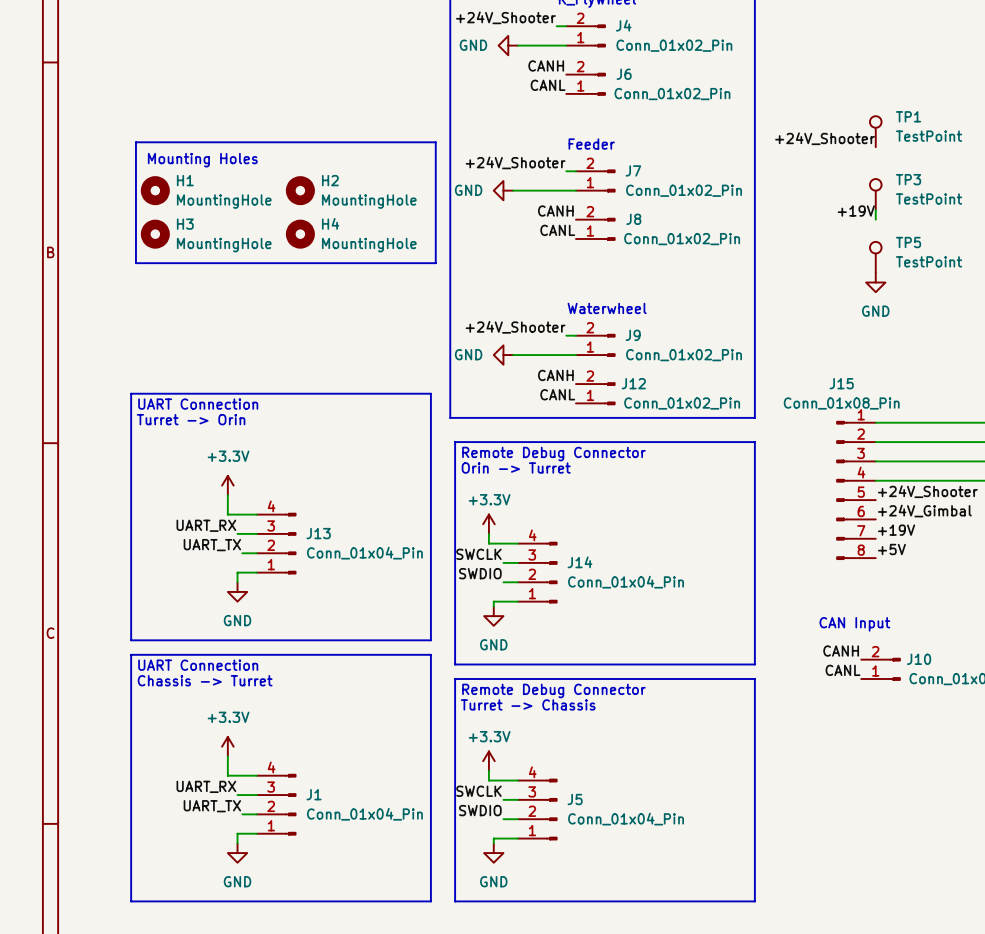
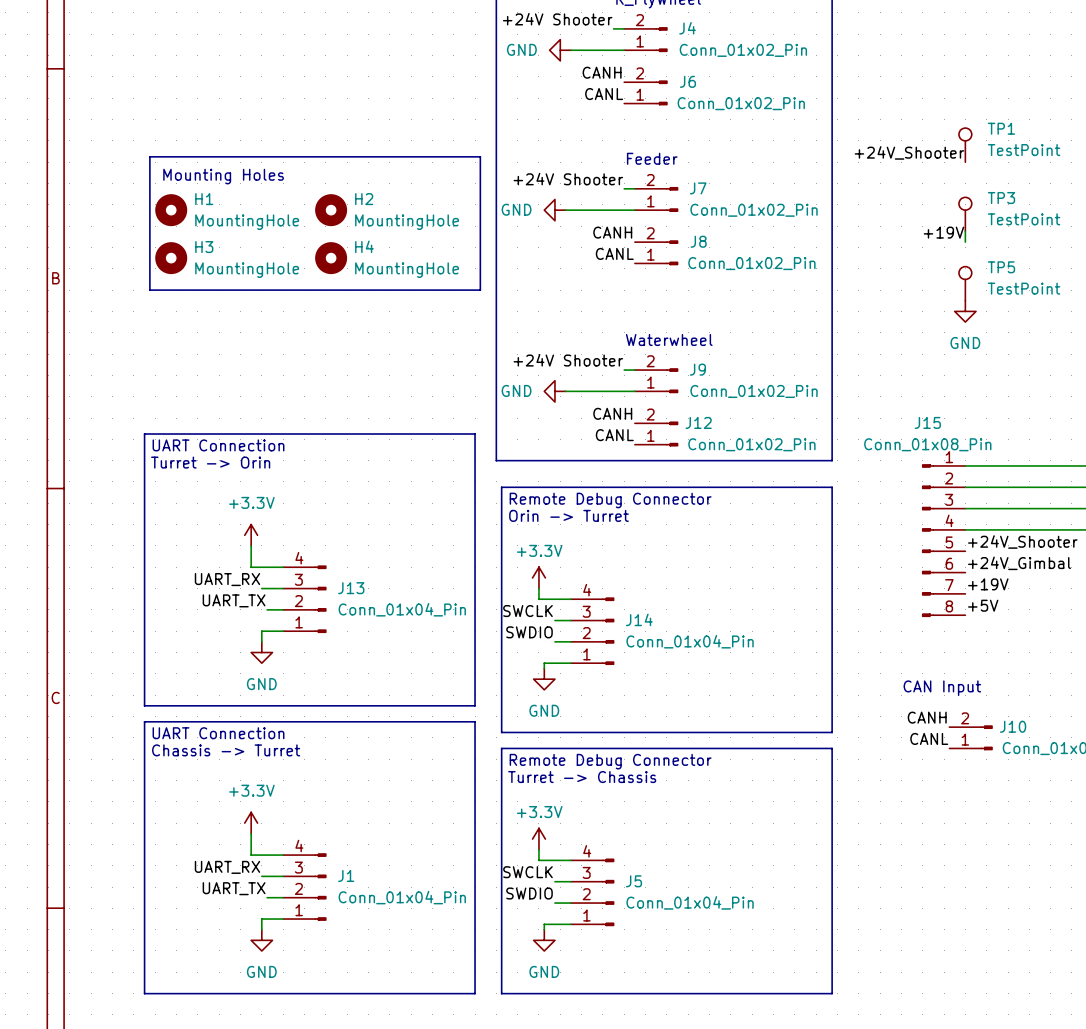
label: +24V_Shooter (505, 17) -> +24V Shooter (557, 19)
label: +24V_Shooter (515, 162) -> +24V Shooter (568, 179)
label: +24V_Shooter (515, 327) -> +24V Shooter (568, 360)

